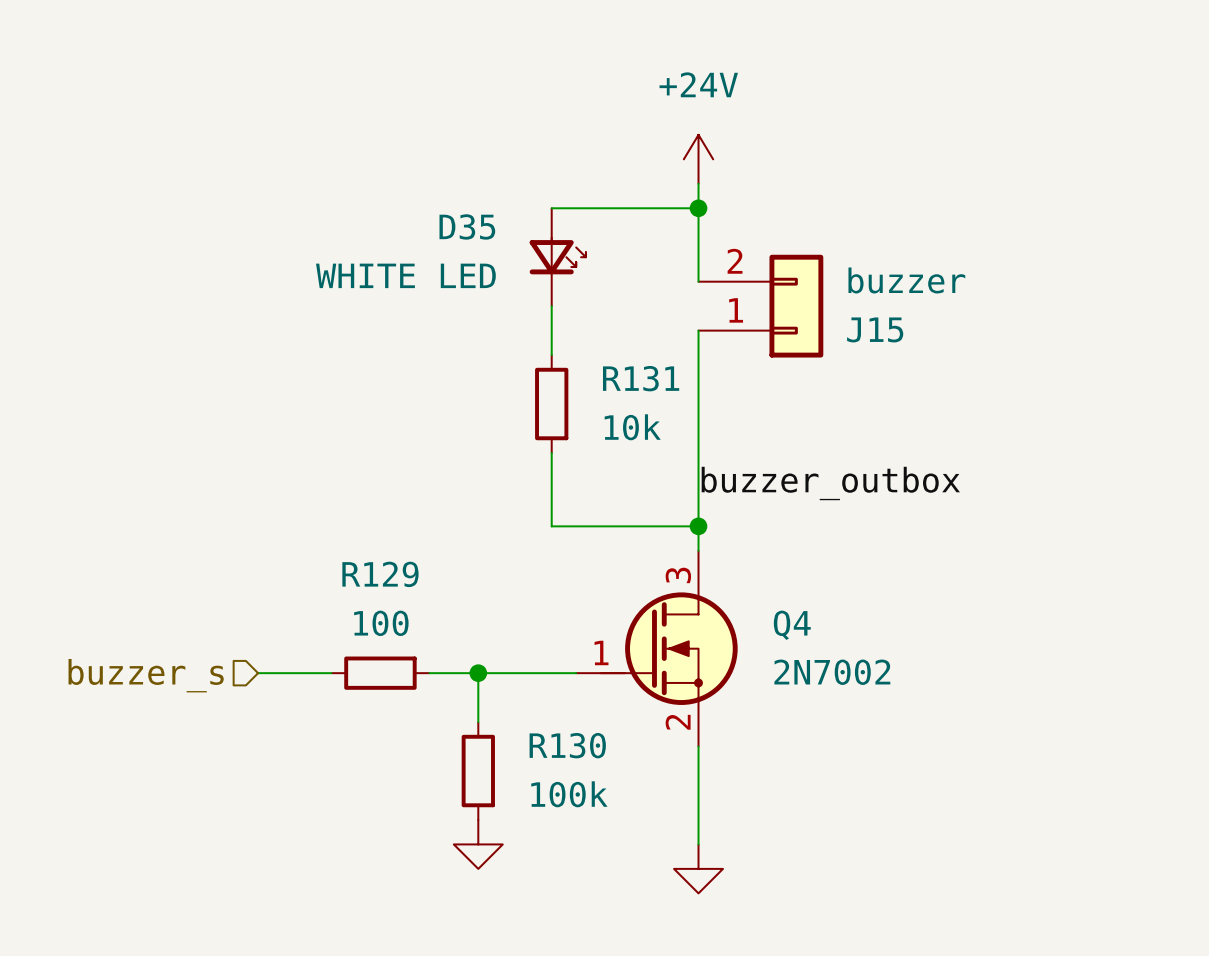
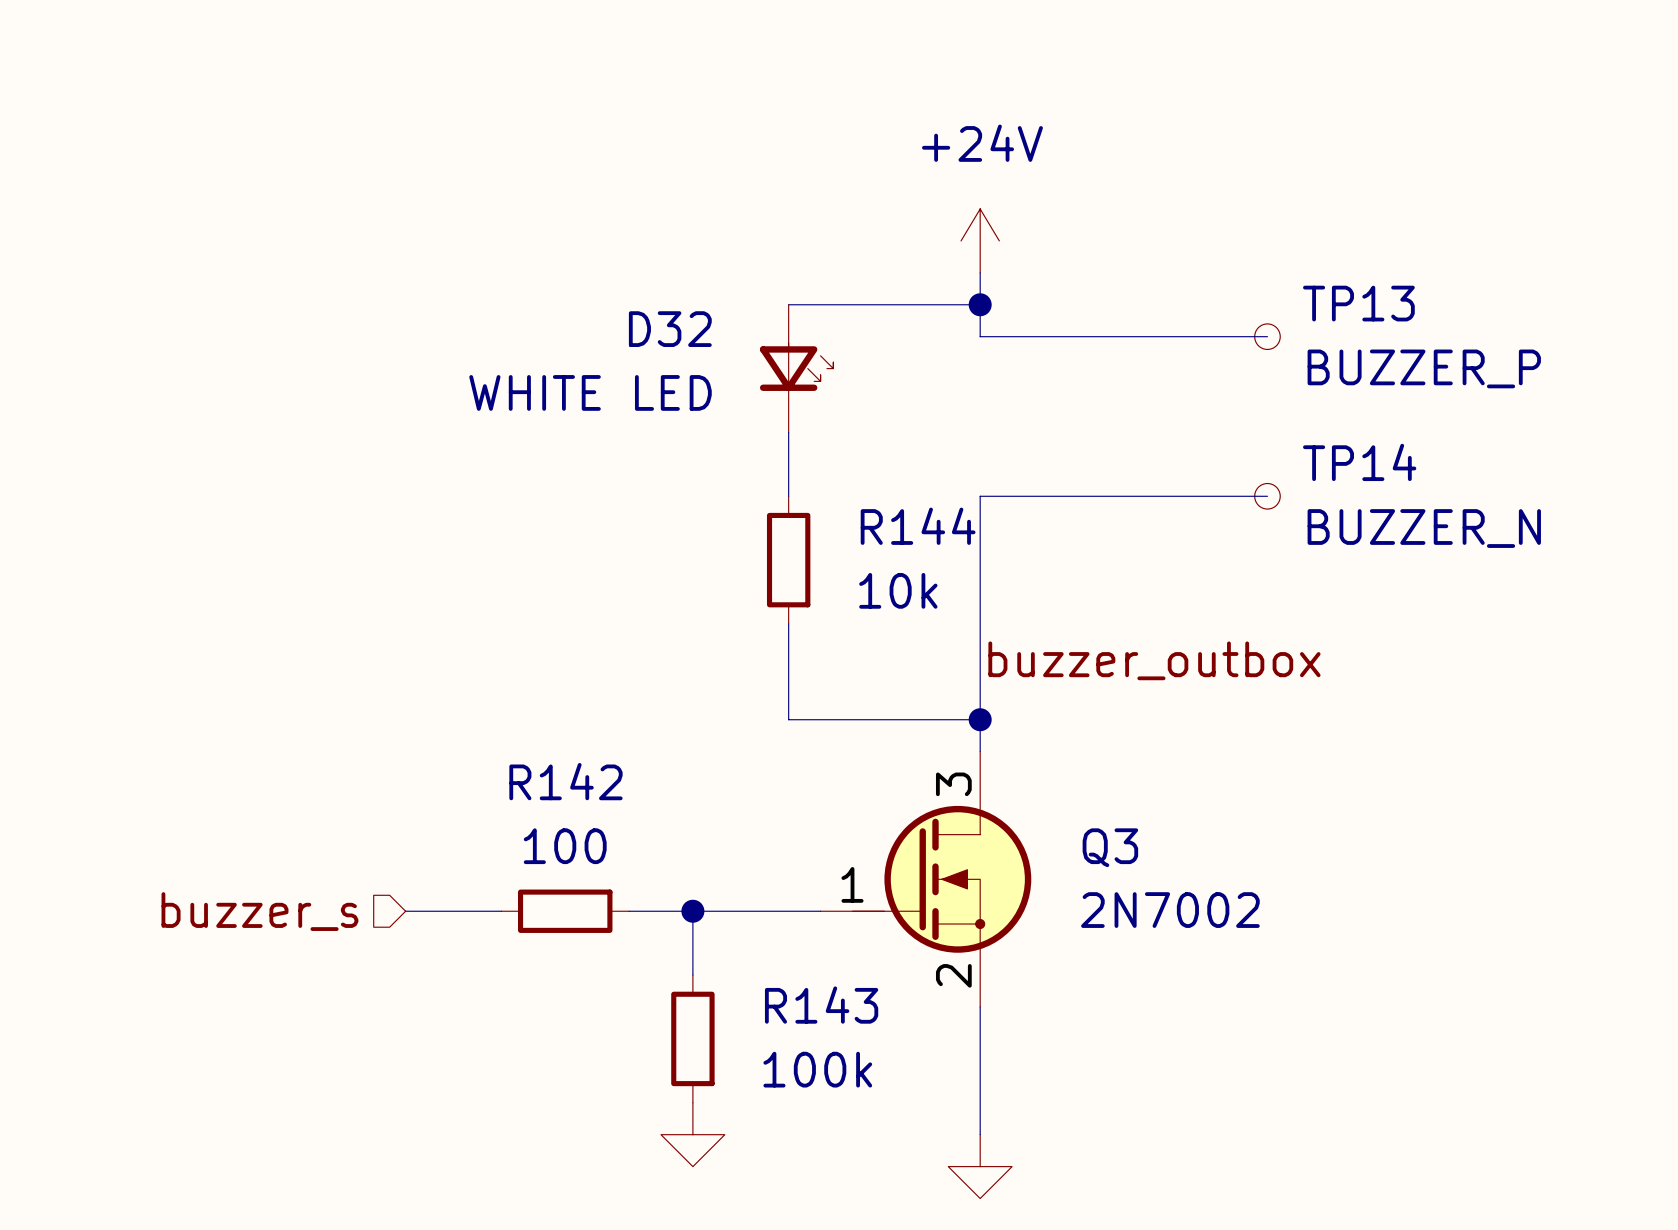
D35 name: D35 (467, 226) -> D32 (670, 329)
wire: (698, 232) (698, 281) -> (980, 336) (1267, 336)
TP13: none -> BUZZER_P (1267, 336)
J15: buzzer (760, 306) -> none
wire: (698, 330) (698, 355) -> (1267, 496) (980, 496)
TP14: none -> BUZZER_N (1267, 496)
R131 name: R131 (641, 378) -> R144 (918, 526)
R129 name: R129 (380, 574) -> R142 (565, 781)
Q4 name: Q4 (792, 625) -> Q3 (1110, 847)
R130 name: R130 (567, 745) -> R143 (821, 1005)

